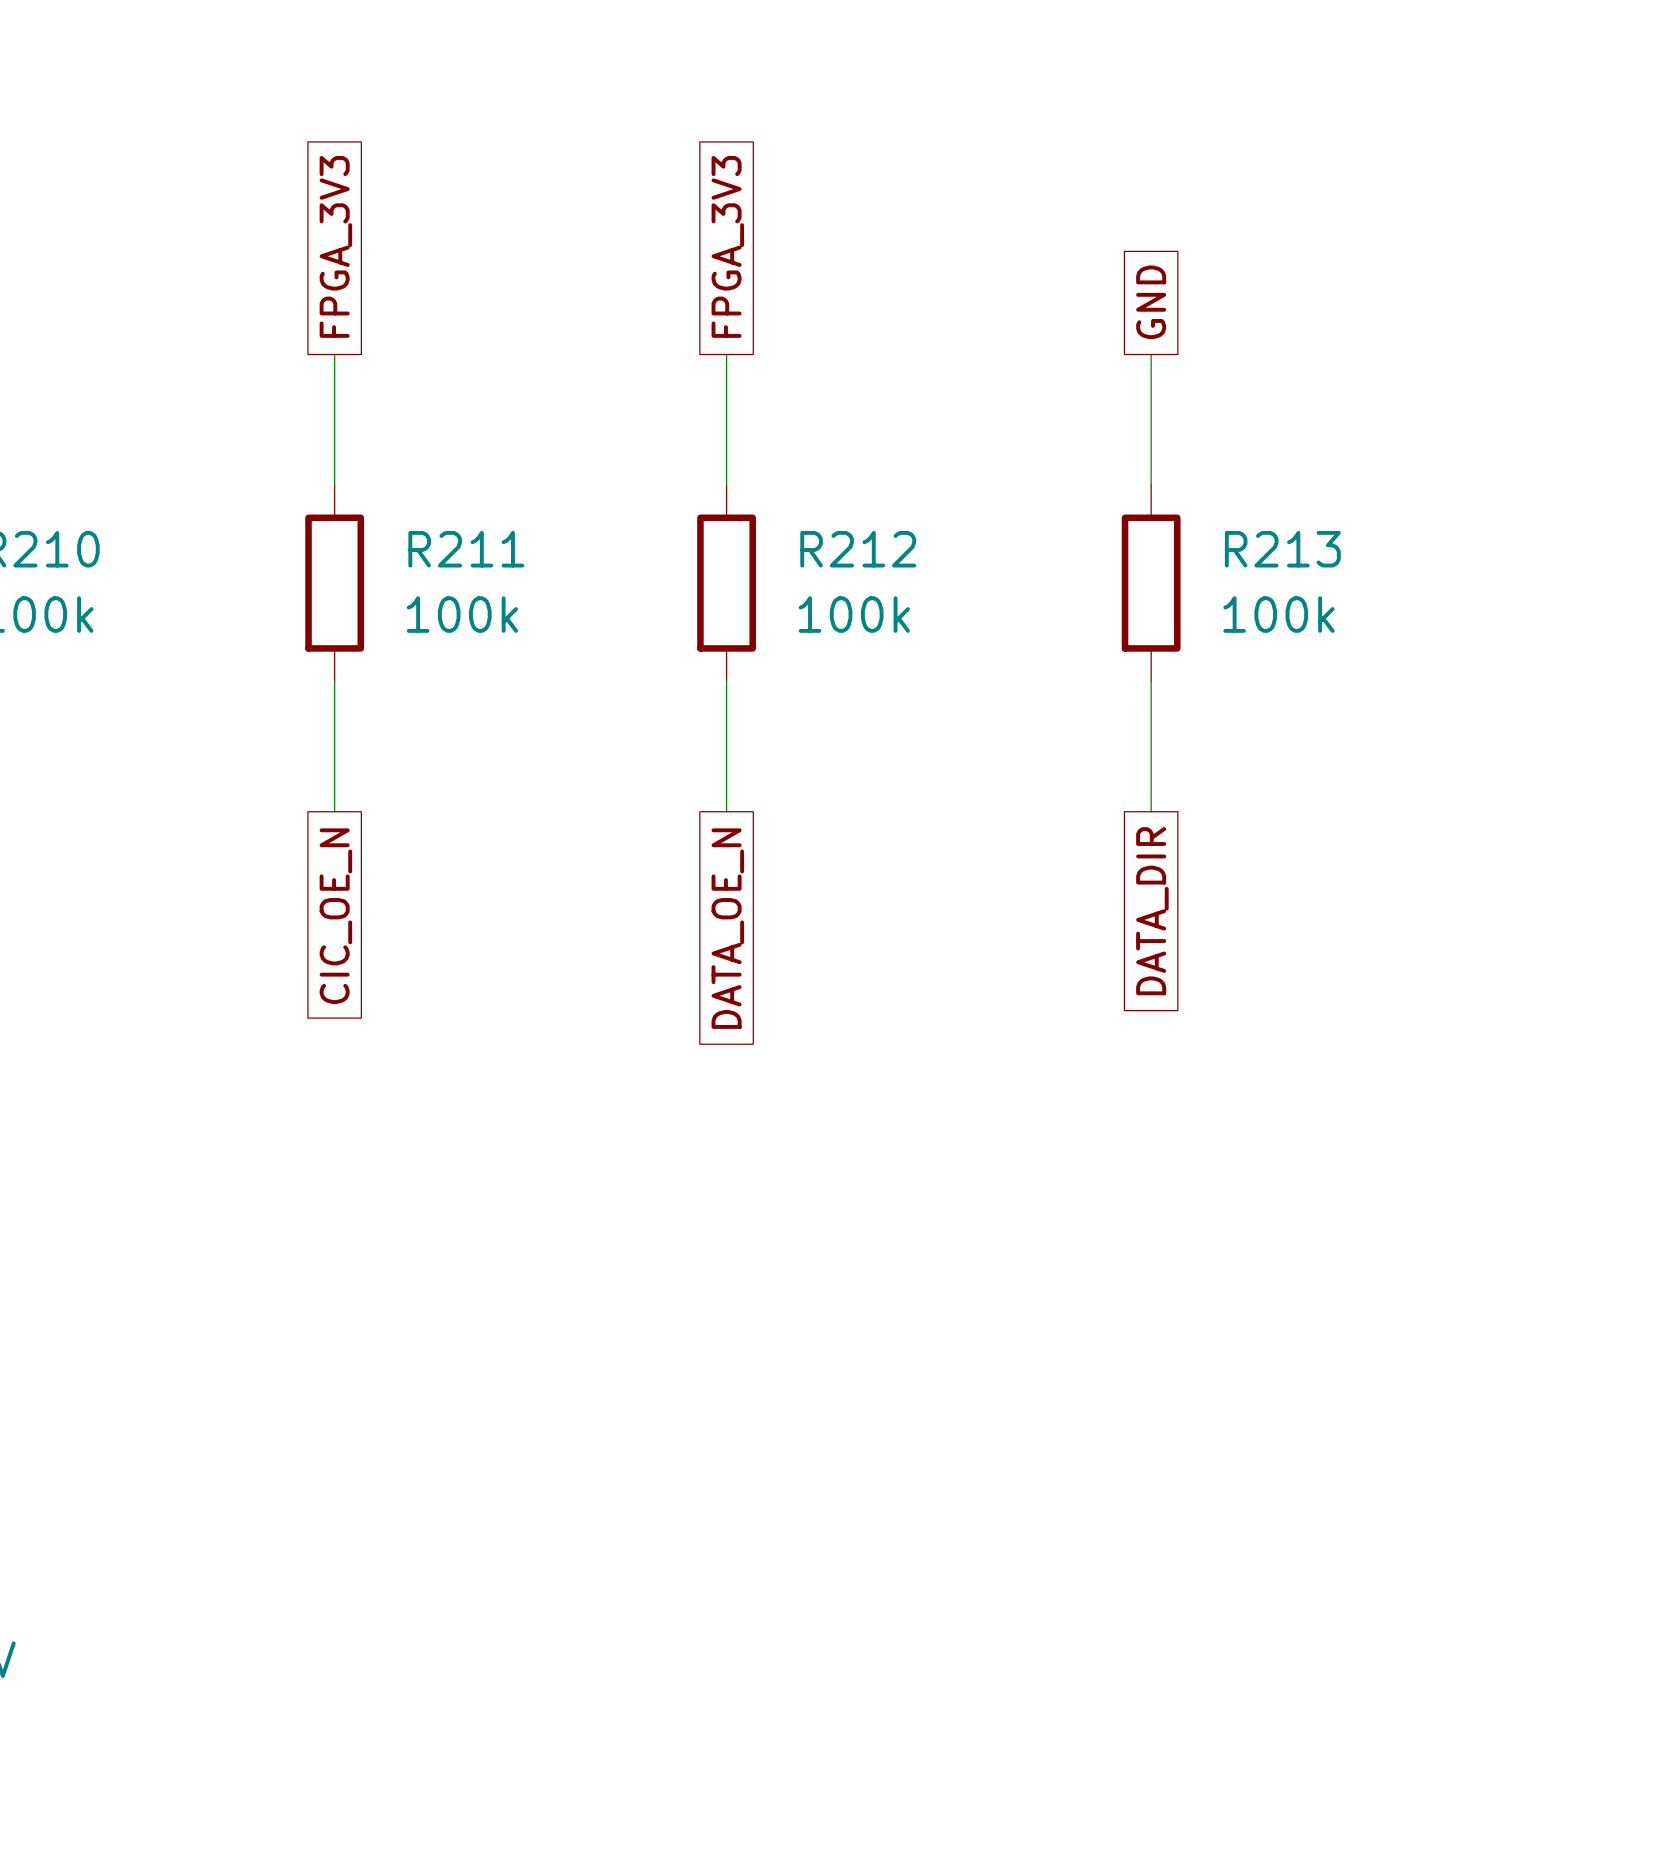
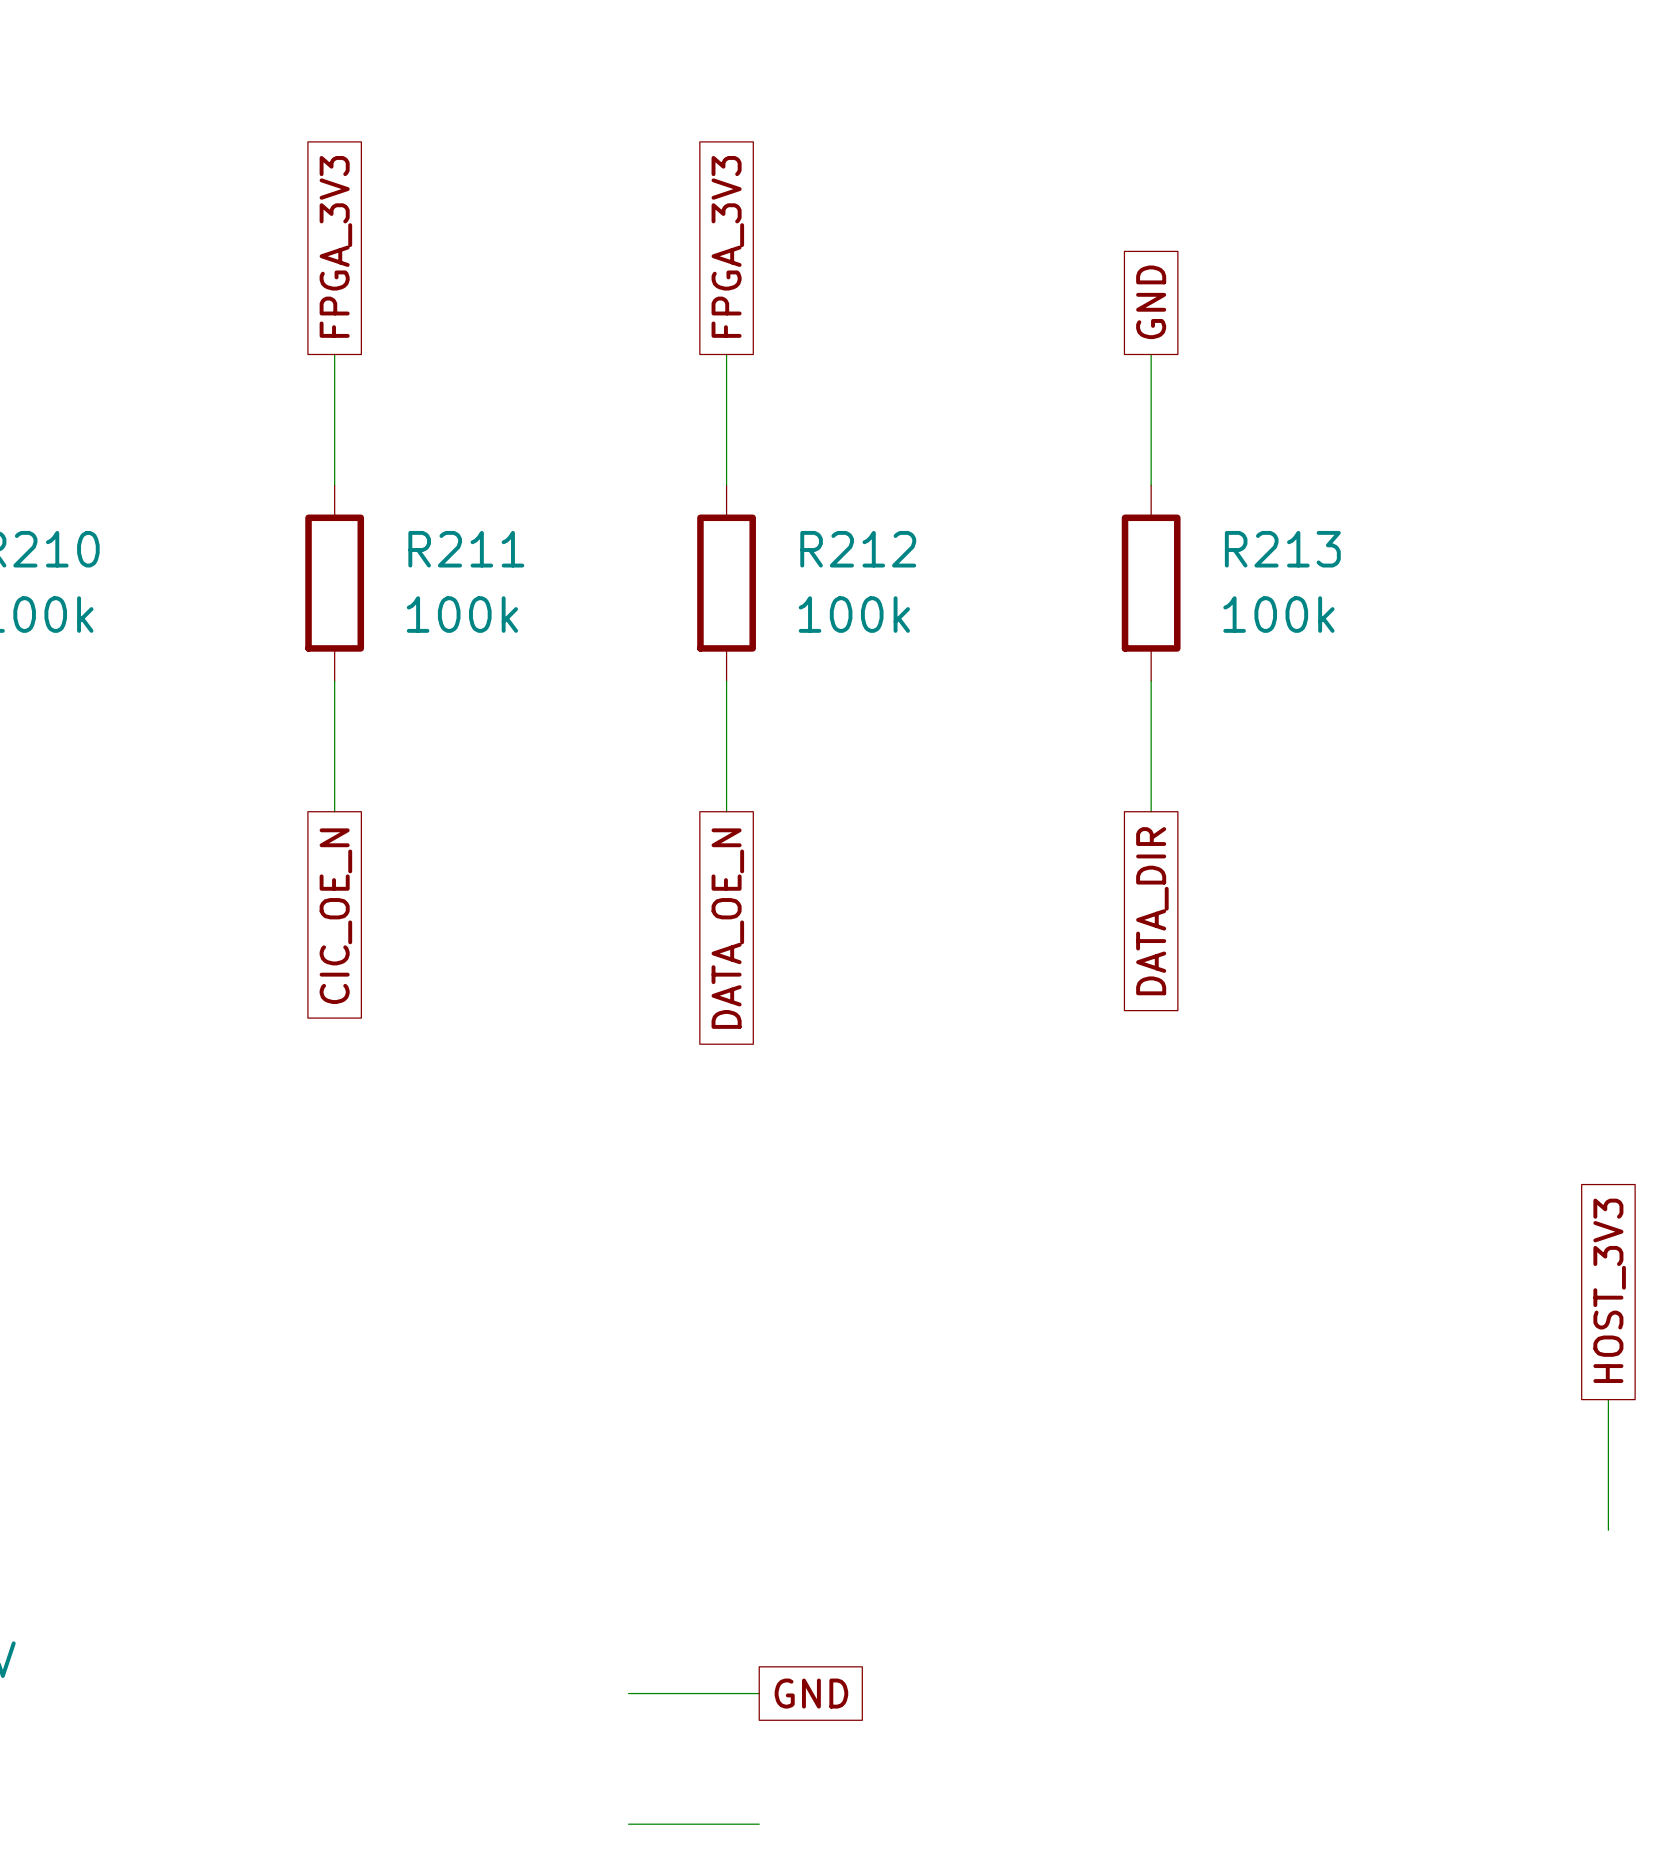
global label: none -> HOST_3V3 (1609, 1290)
wire: none -> (1608, 1399) (1608, 1530)
wire: none -> (628, 1693) (759, 1693)
global label: none -> GND (811, 1693)
wire: none -> (628, 1824) (759, 1824)

